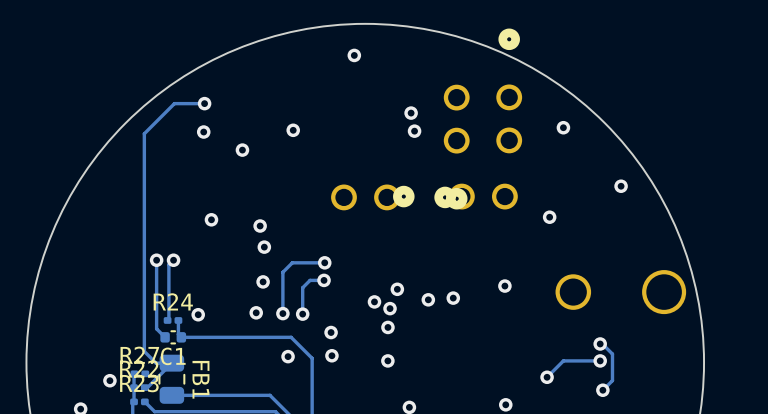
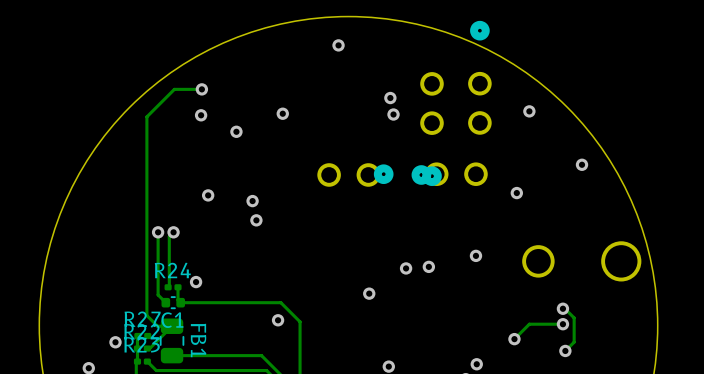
track: (324, 262) (292, 262) (282, 272) (282, 313) -> none
via: (324, 262) -> none
track: (324, 280) (310, 280) (302, 287) (302, 314) -> none
via: (324, 280) -> none
via: (263, 281) -> none
via: (397, 289) -> none
via: (374, 301) -> none
via: (390, 308) -> none
via: (256, 312) -> none
via: (282, 313) -> none
via: (302, 314) -> none
via: (331, 332) -> none
via: (331, 355) -> none
via: (387, 360) -> none

